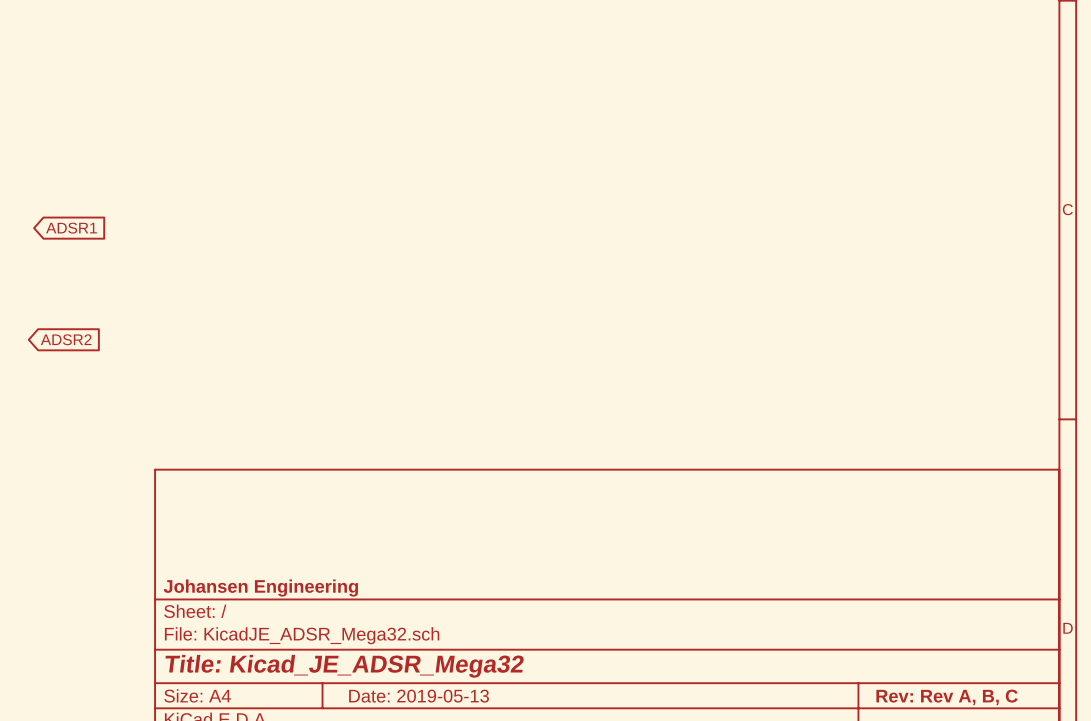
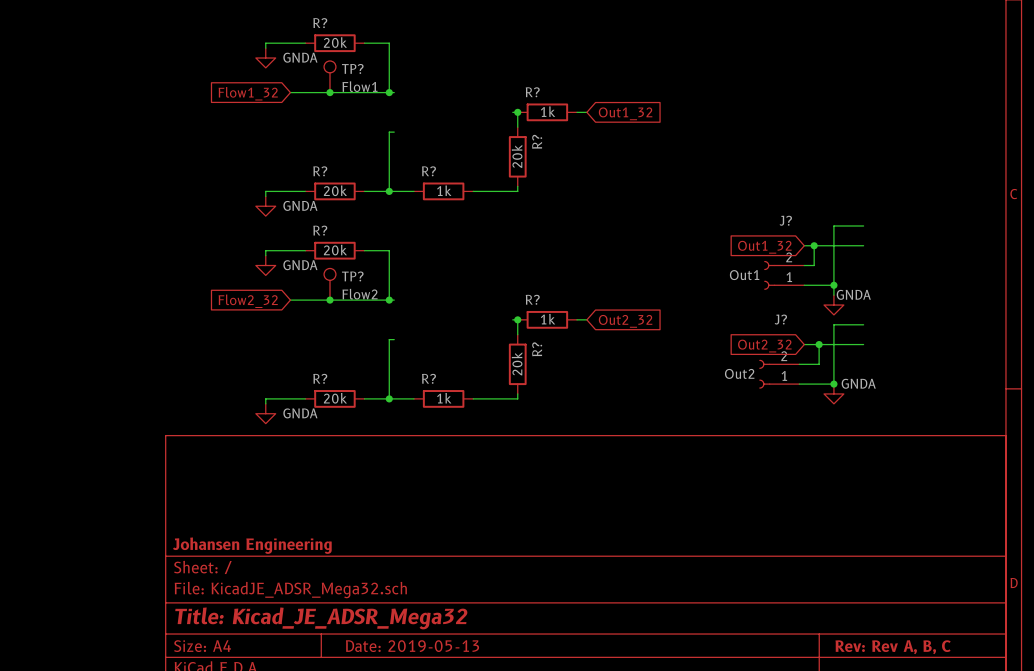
wire: none -> (305, 43) (265, 43) (265, 48)
R?: none -> 20k (334, 43)
wire: none -> (364, 43) (389, 43) (389, 92)
power symbol: none -> GNDA (265, 58)
TP?: none -> Flow1 (329, 76)
wire: none -> (290, 92) (394, 92)
junction: none -> (329, 92)
junction: none -> (389, 92)
global label: none -> Flow1_32 (248, 93)
wire: none -> (512, 112) (517, 112) (517, 127)
junction: none -> (517, 112)
R?: none -> 1k (547, 112)
wire: none -> (577, 112) (586, 112)
global label: none -> Out1_32 (625, 113)
wire: none -> (394, 132) (389, 132) (389, 191)
R?: none -> 20k (517, 156)
wire: none -> (517, 186) (517, 191) (473, 191)
wire: none -> (305, 191) (265, 191) (265, 196)
R?: none -> 20k (334, 191)
wire: none -> (364, 191) (413, 191)
junction: none -> (389, 191)
R?: none -> 1k (443, 191)
power symbol: none -> GNDA (265, 206)
global label: ADSR1 (71, 228) -> none
wire: none -> (863, 225) (833, 225) (833, 295)
wire: none -> (804, 245) (863, 245)
wire: none -> (814, 245) (814, 265) (804, 265)
junction: none -> (814, 245)
global label: none -> Out1_32 (764, 247)
wire: none -> (305, 250) (265, 250) (265, 255)
R?: none -> 20k (334, 250)
wire: none -> (364, 250) (389, 250) (389, 300)
power symbol: none -> GNDA (265, 265)
J?: none -> Out1 (784, 275)
TP?: none -> Flow2 (329, 284)
wire: none -> (804, 285) (833, 285)
junction: none -> (833, 285)
wire: none -> (290, 300) (394, 300)
junction: none -> (329, 300)
junction: none -> (389, 300)
global label: none -> Flow2_32 (248, 301)
power symbol: none -> GNDA (833, 305)
global label: ADSR2 (66, 339) -> none
wire: none -> (512, 319) (517, 319) (517, 334)
junction: none -> (517, 319)
R?: none -> 1k (547, 319)
wire: none -> (577, 319) (586, 319)
global label: none -> Out2_32 (625, 321)
wire: none -> (863, 324) (833, 324) (833, 384) (799, 384)
wire: none -> (394, 339) (389, 339) (389, 398)
wire: none -> (804, 344) (863, 344)
wire: none -> (819, 344) (819, 364) (799, 364)
junction: none -> (819, 344)
global label: none -> Out2_32 (764, 346)
R?: none -> 20k (517, 364)
J?: none -> Out2 (779, 374)
junction: none -> (833, 384)
wire: none -> (517, 393) (517, 398) (473, 398)
power symbol: none -> GNDA (833, 393)
wire: none -> (305, 398) (265, 398) (265, 403)
R?: none -> 20k (334, 398)
wire: none -> (364, 398) (413, 398)
junction: none -> (389, 398)
R?: none -> 1k (443, 398)
power symbol: none -> GNDA (265, 413)

